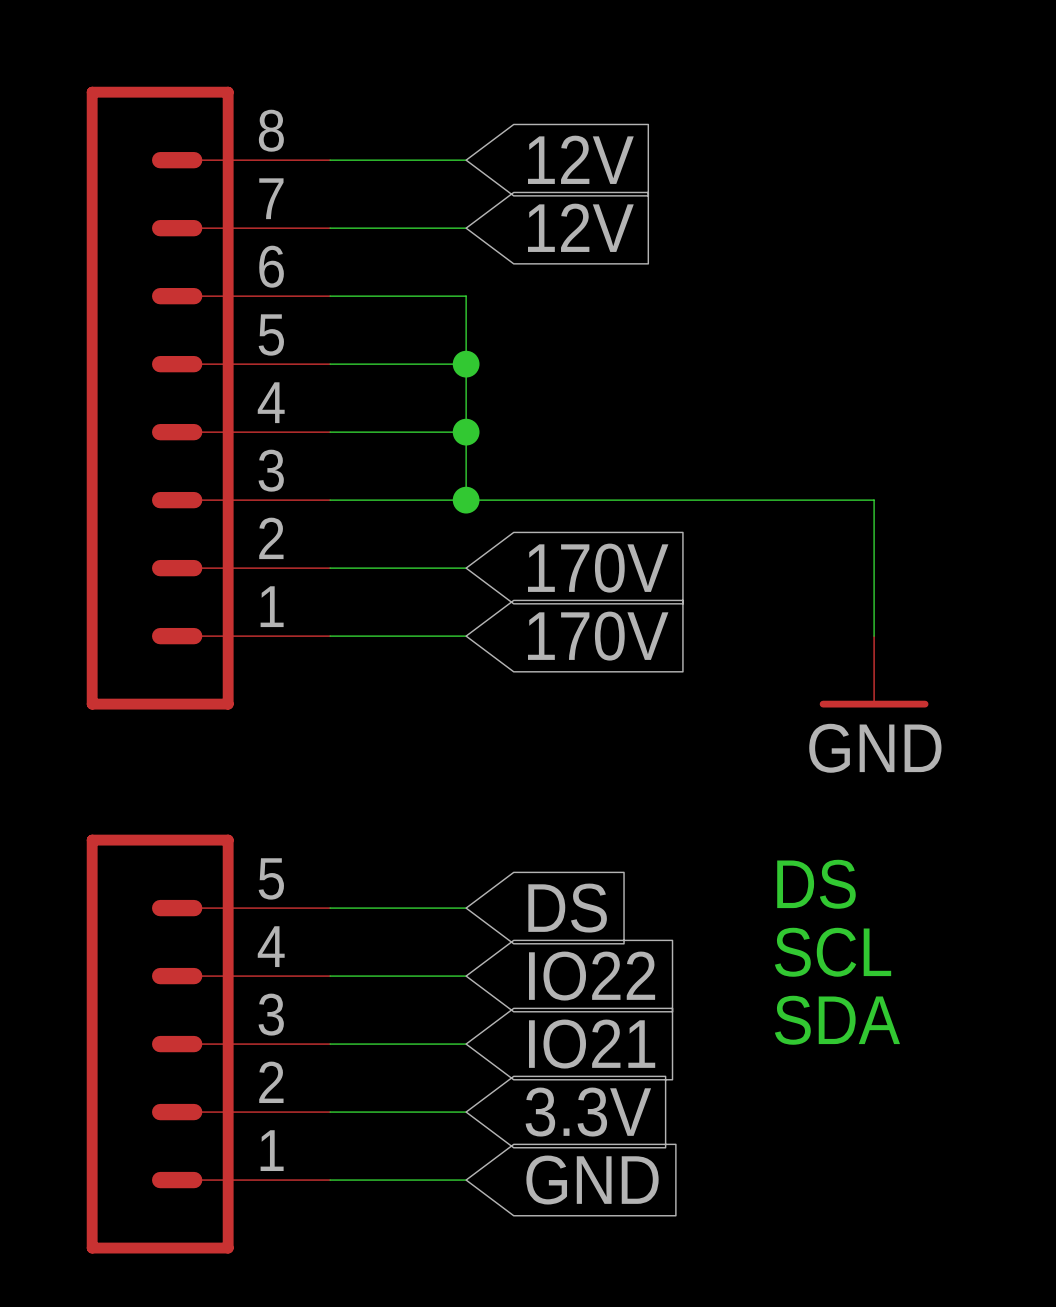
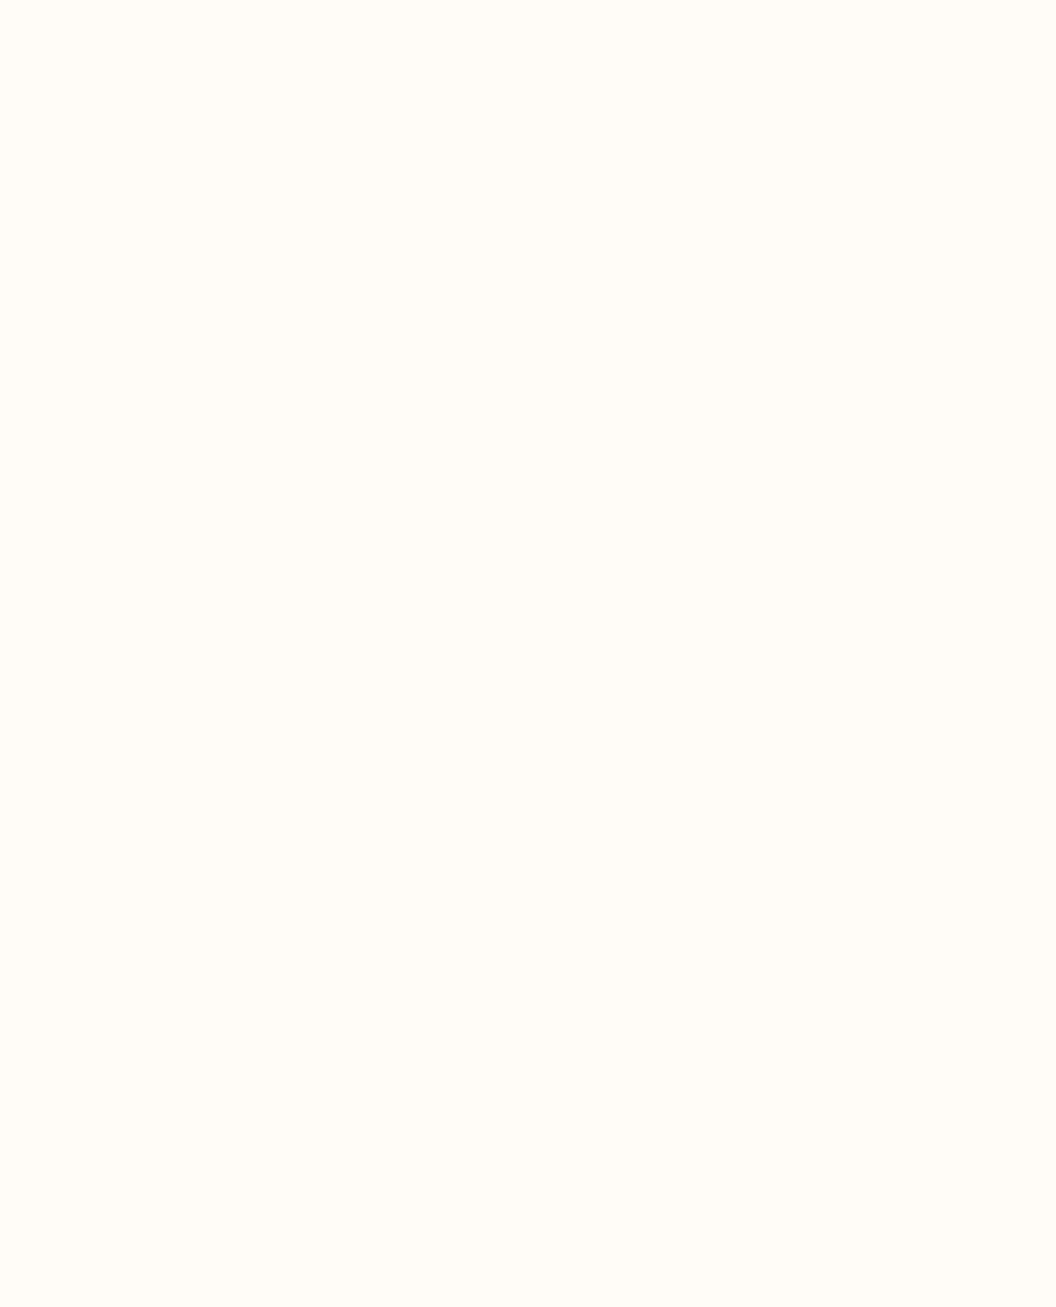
global label: 12V (580, 159) -> none
wire: (330, 160) (466, 160) -> none
global label: 12V (580, 227) -> none
wire: (330, 228) (466, 228) -> none
wire: (330, 296) (466, 296) (466, 500) -> none
wire: (330, 364) (466, 364) -> none
junction: (466, 364) -> none
part: (208, 398) -> none
wire: (330, 432) (466, 432) -> none
junction: (466, 432) -> none
wire: (330, 500) (874, 500) (874, 636) -> none
junction: (466, 500) -> none
wire: (330, 568) (466, 568) -> none
global label: 170V (598, 568) -> none
wire: (330, 636) (466, 636) -> none
global label: 170V (598, 636) -> none
power symbol: GND (874, 671) -> none
text: DS (816, 884) -> none
wire: (330, 908) (466, 908) -> none
global label: DS (567, 908) -> none
text: SCL (833, 952) -> none
wire: (330, 976) (466, 976) -> none
global label: IO22 (592, 976) -> none
text: SDA (837, 1020) -> none
part: (208, 1044) -> none
wire: (330, 1044) (466, 1044) -> none
global label: IO21 (592, 1044) -> none
wire: (330, 1112) (466, 1112) -> none
global label: 3.3V (588, 1112) -> none
wire: (330, 1180) (466, 1180) -> none
global label: GND (592, 1180) -> none

